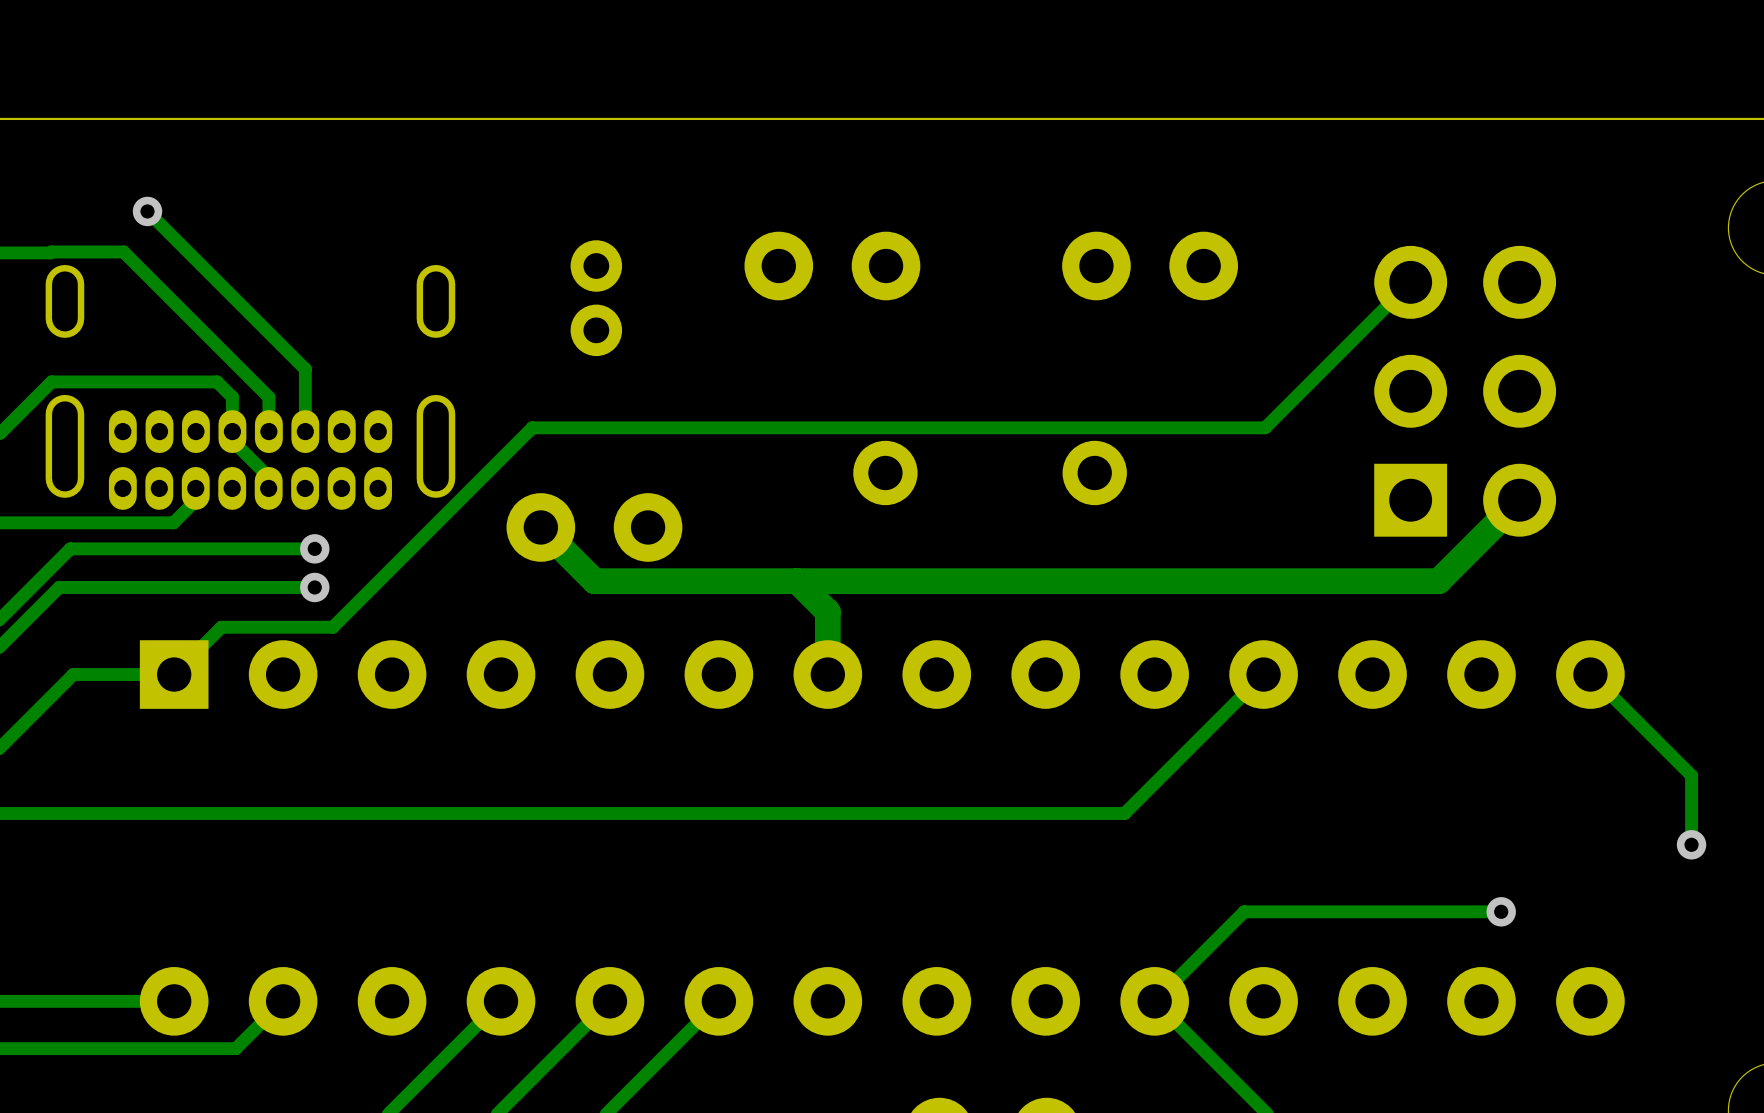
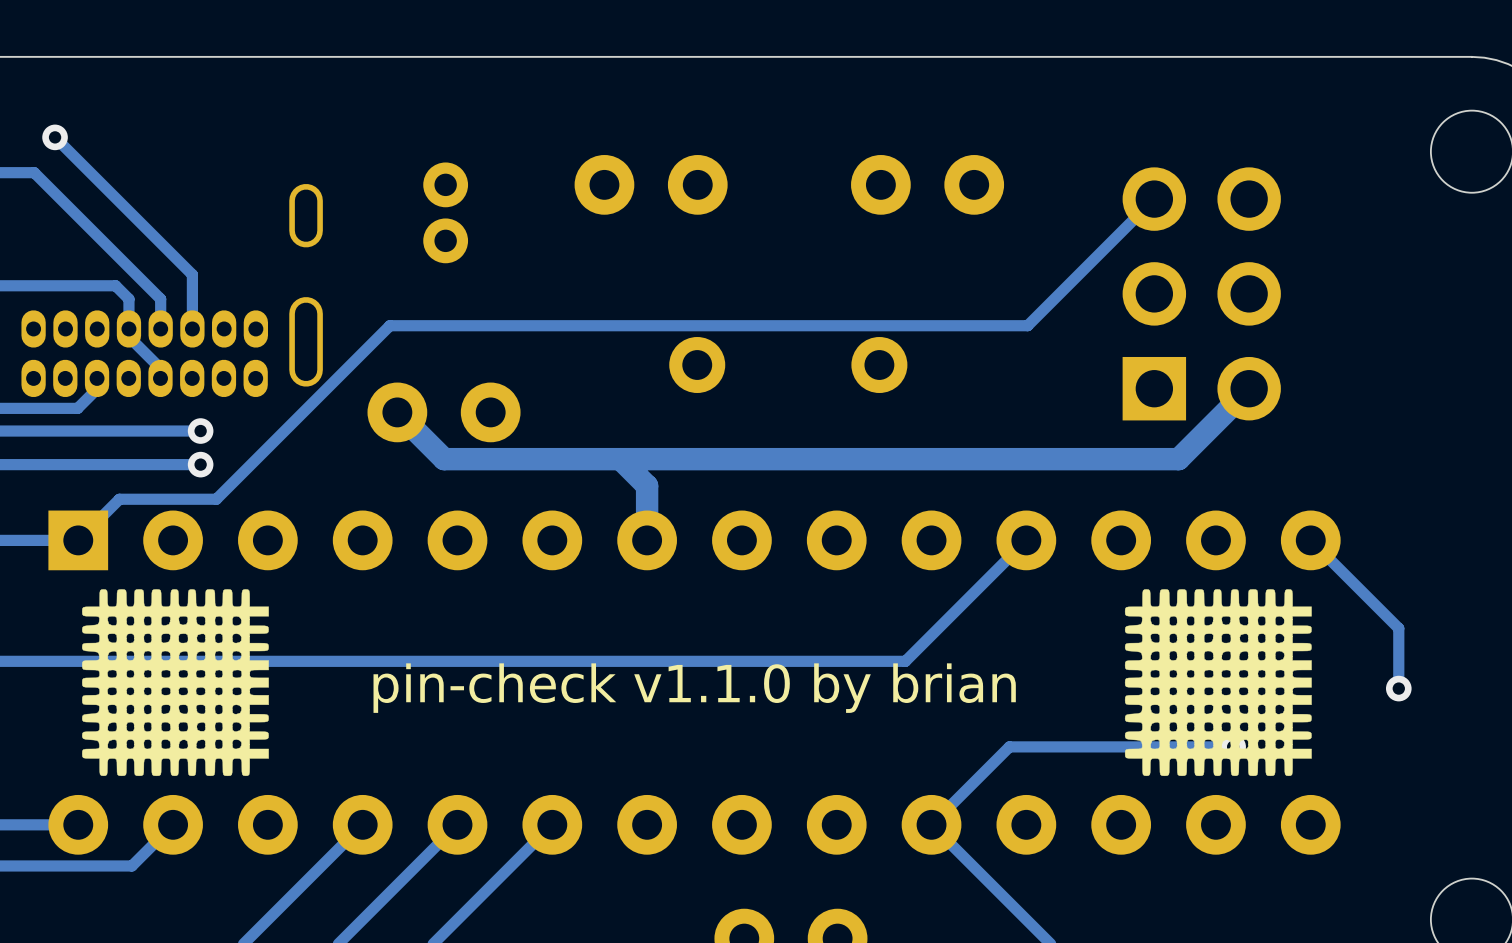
drawing: none -> [82, 589, 269, 777]
drawing: none -> [1124, 589, 1312, 777]
text: none -> pin-check v1.1.0 by brian (694, 688)

